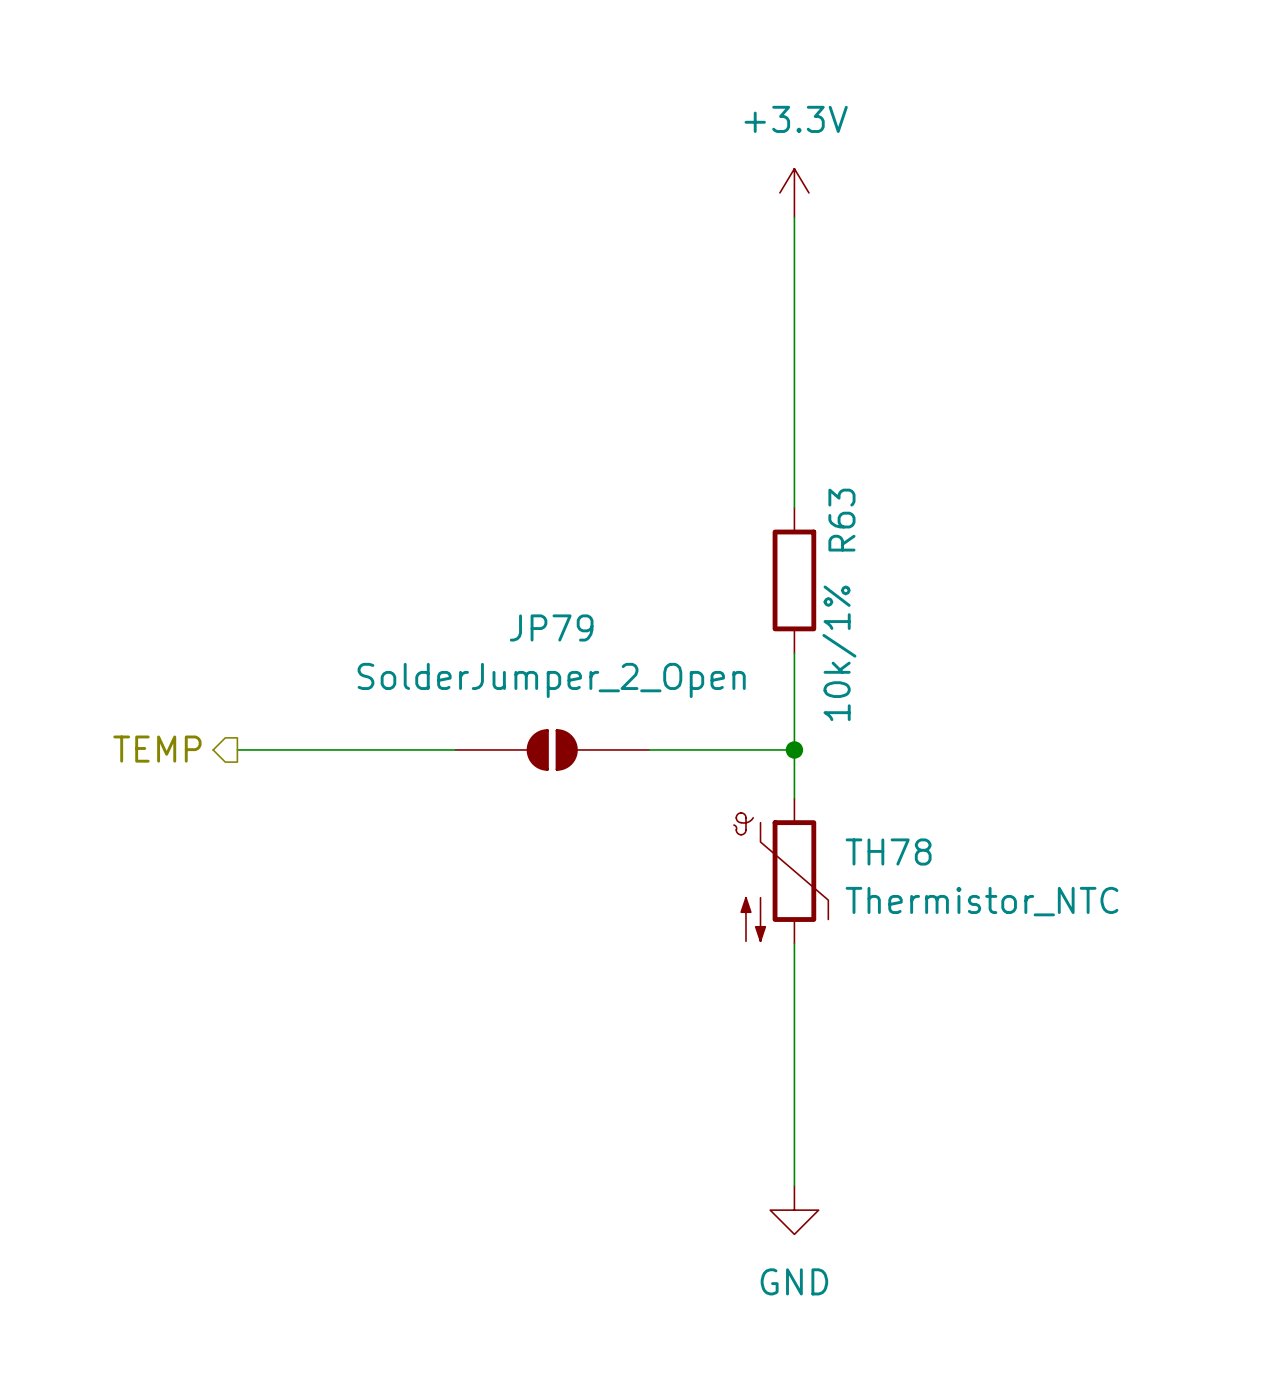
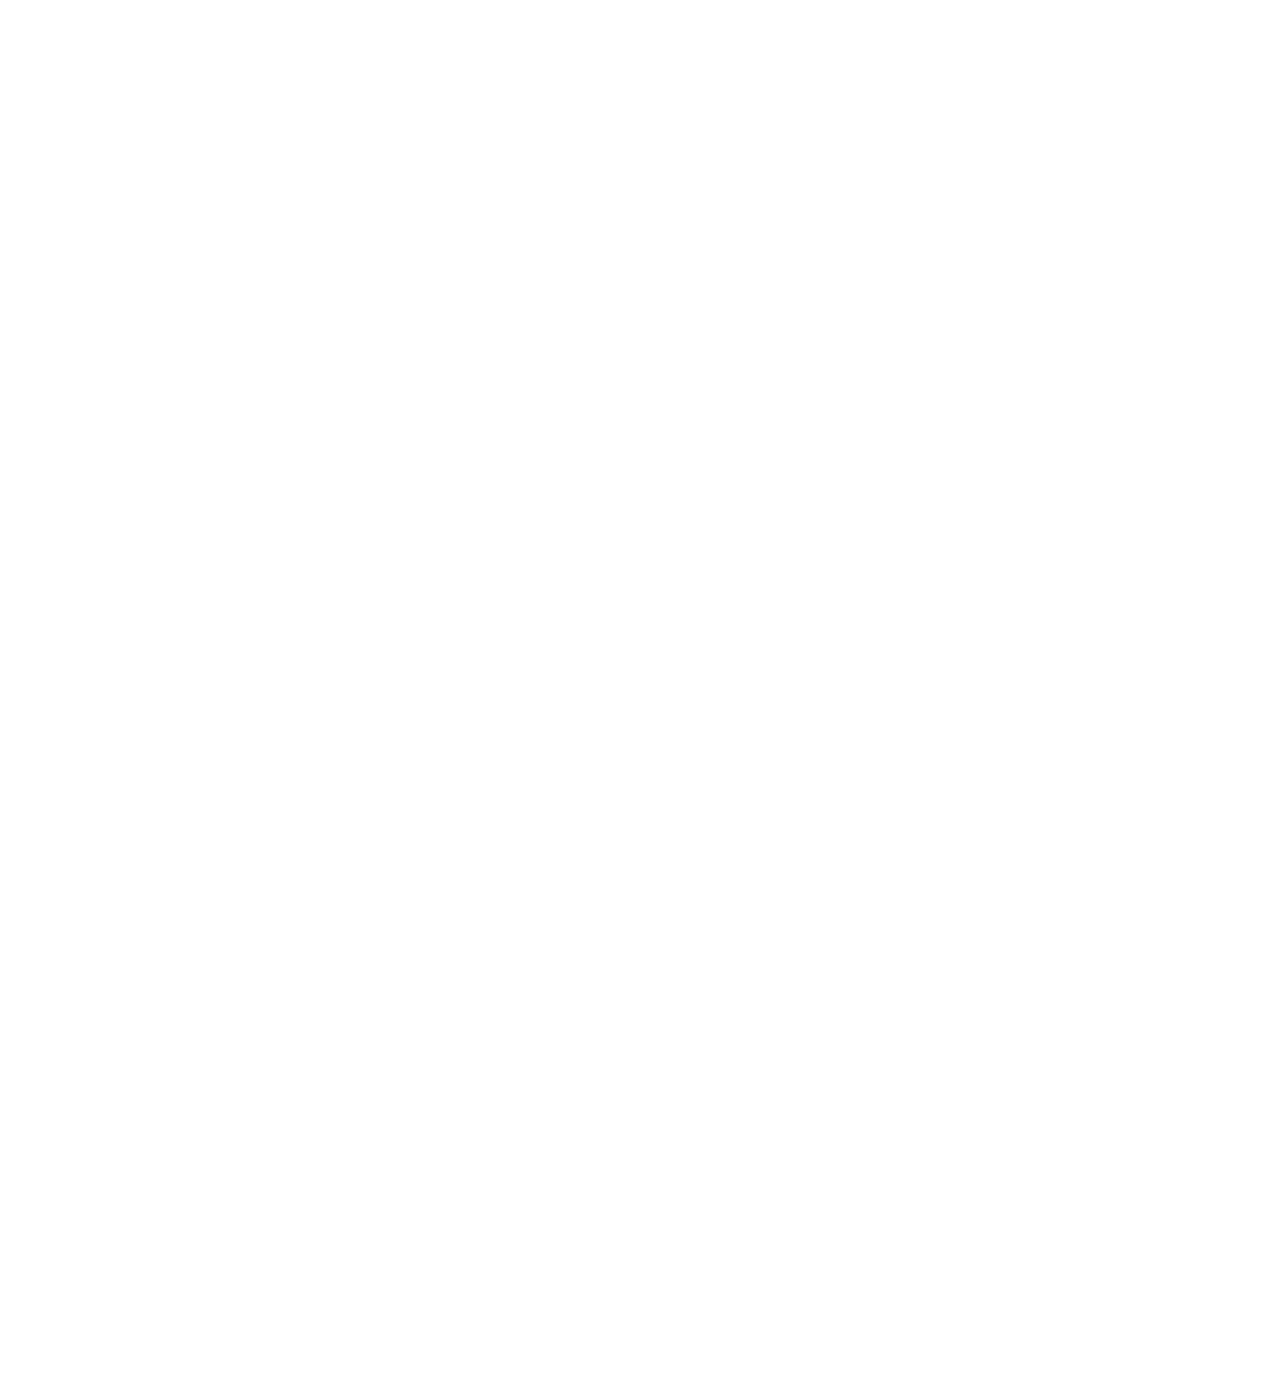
power symbol: +3.3V (794, 192) -> none
wire: (794, 217) (794, 507) -> none
R63: 10k/1% (794, 580) -> none
wire: (794, 653) (794, 798) -> none
hierarchical label: TEMP (157, 749) -> none
wire: (237, 749) (455, 749) -> none
JP79: SolderJumper_2_Open (552, 749) -> none
wire: (649, 749) (794, 749) -> none
junction: (794, 749) -> none
TH78: Thermistor_NTC (781, 871) -> none
wire: (794, 943) (794, 1185) -> none
power symbol: GND (794, 1210) -> none

